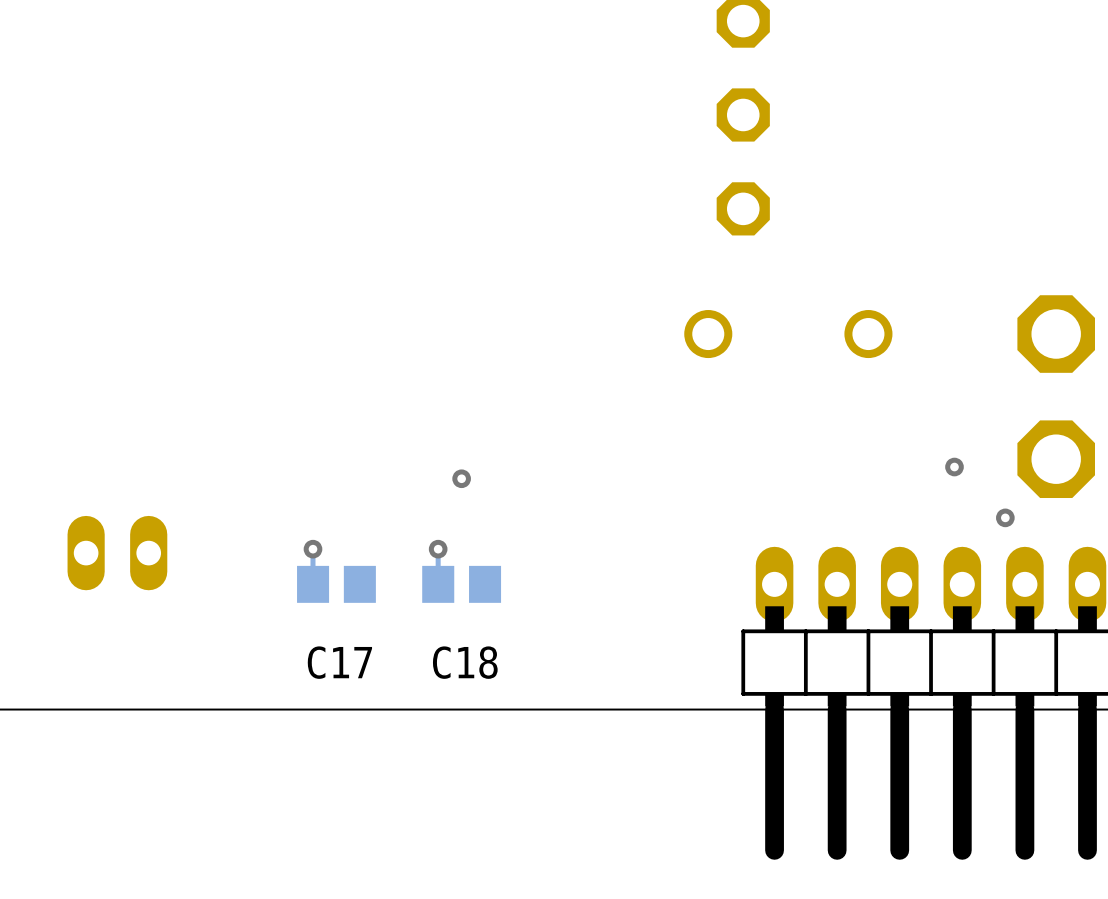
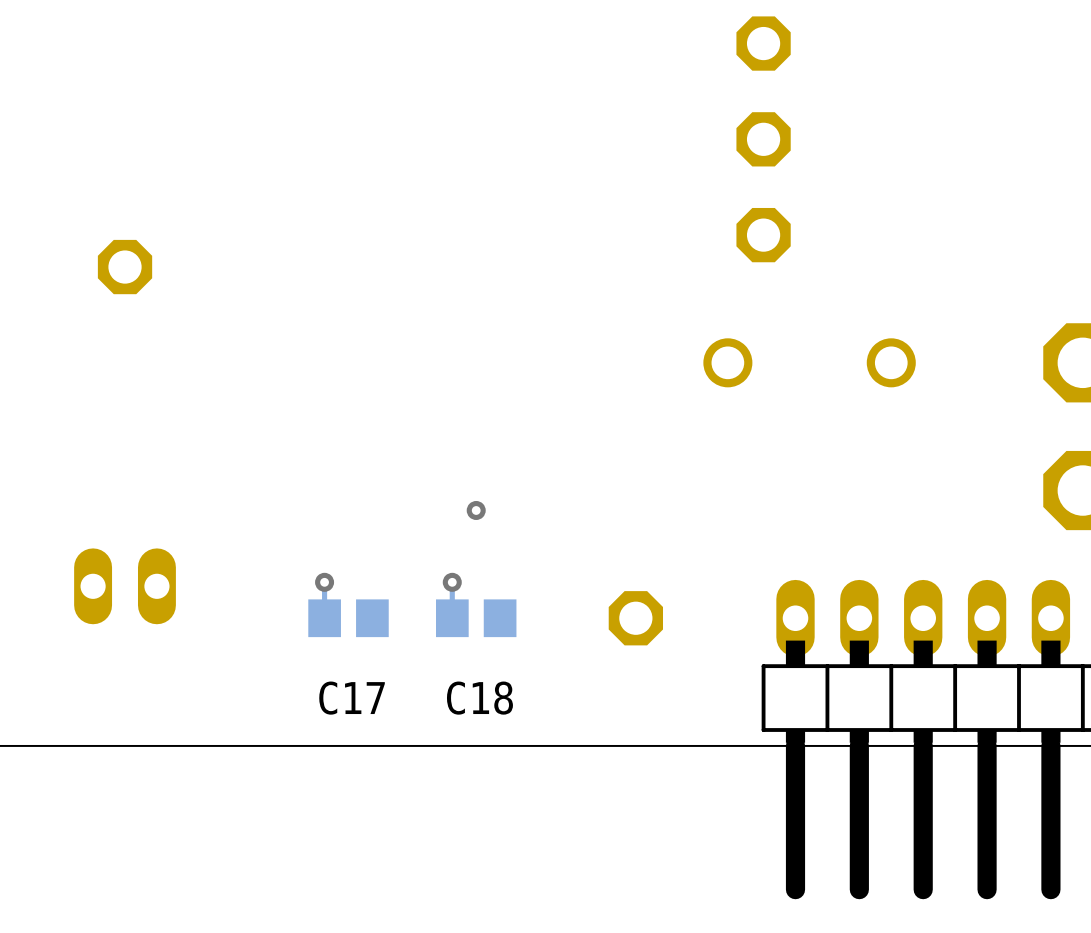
part: none -> (125, 267)
via: (954, 467) -> none
via: (1005, 517) -> none
part: none -> (635, 618)

